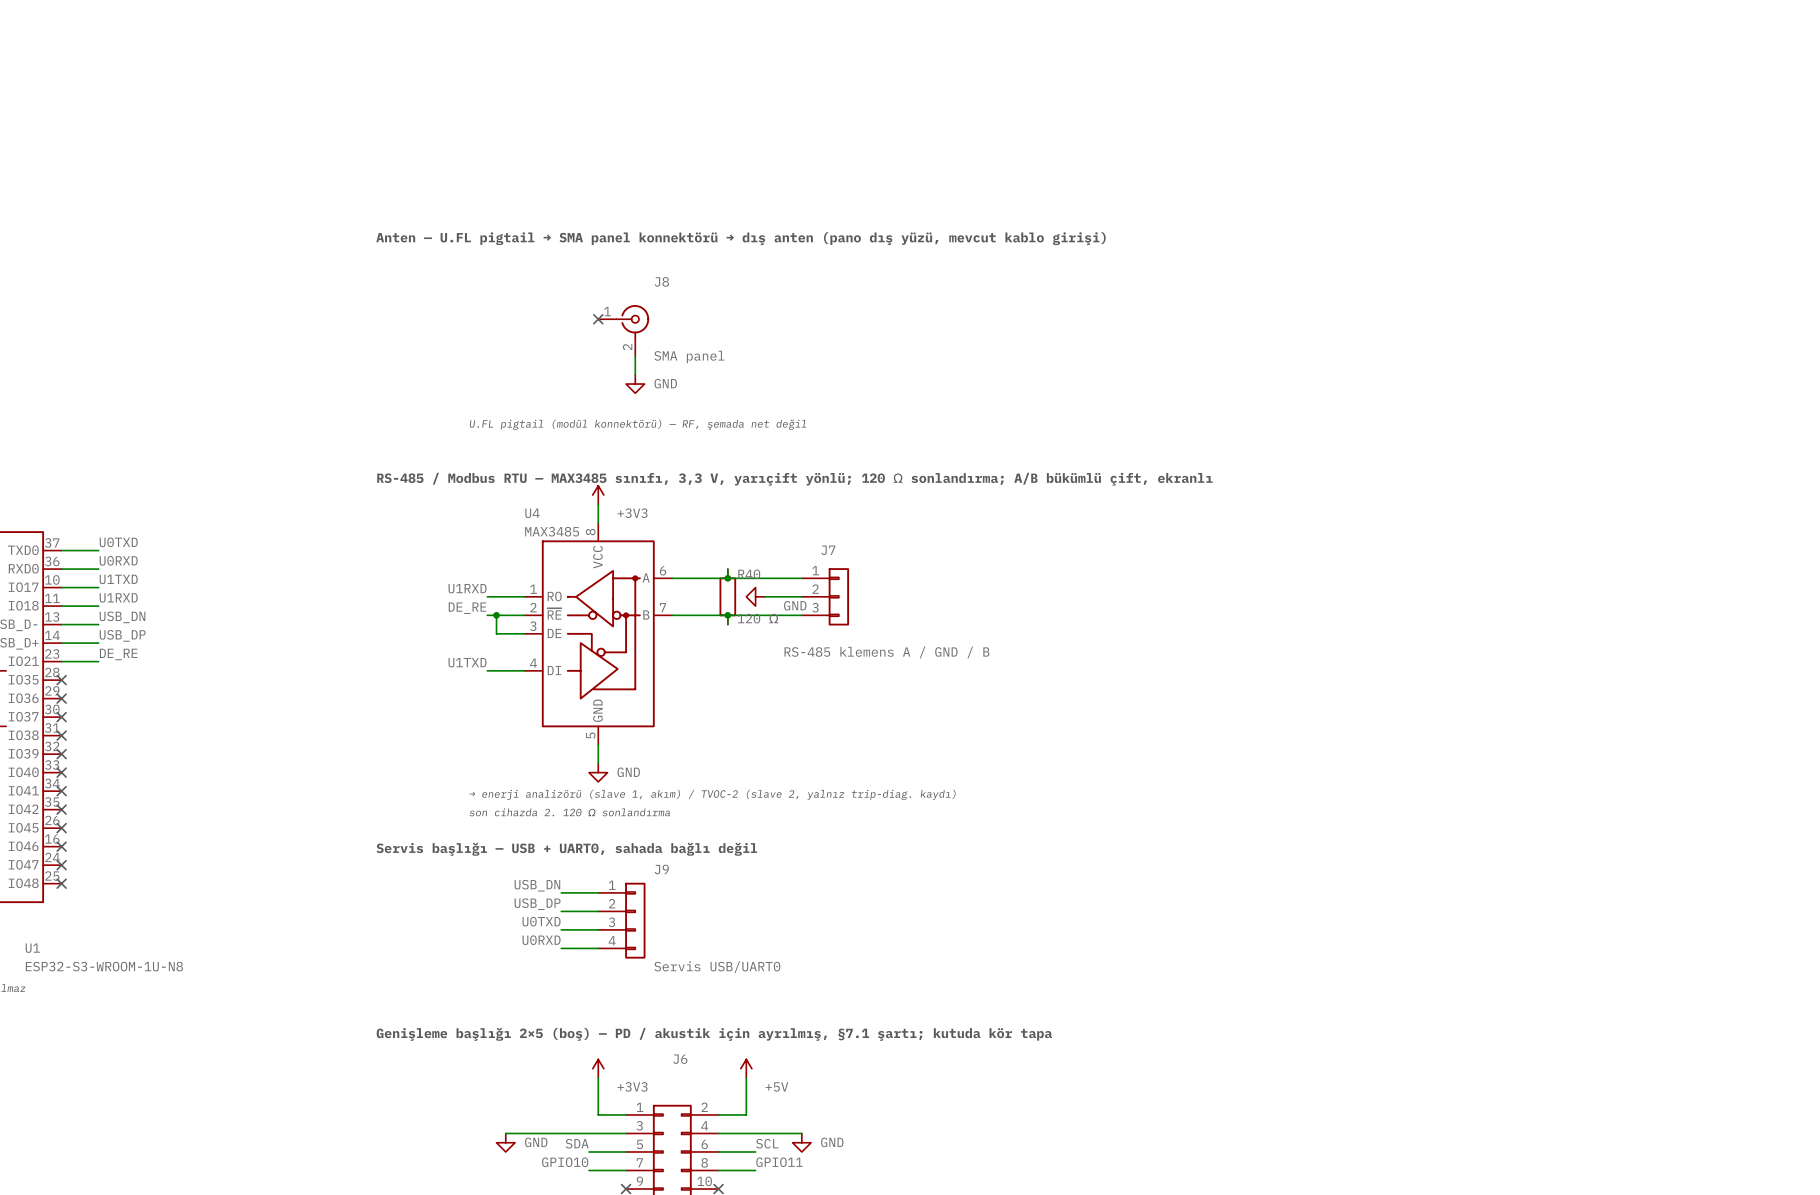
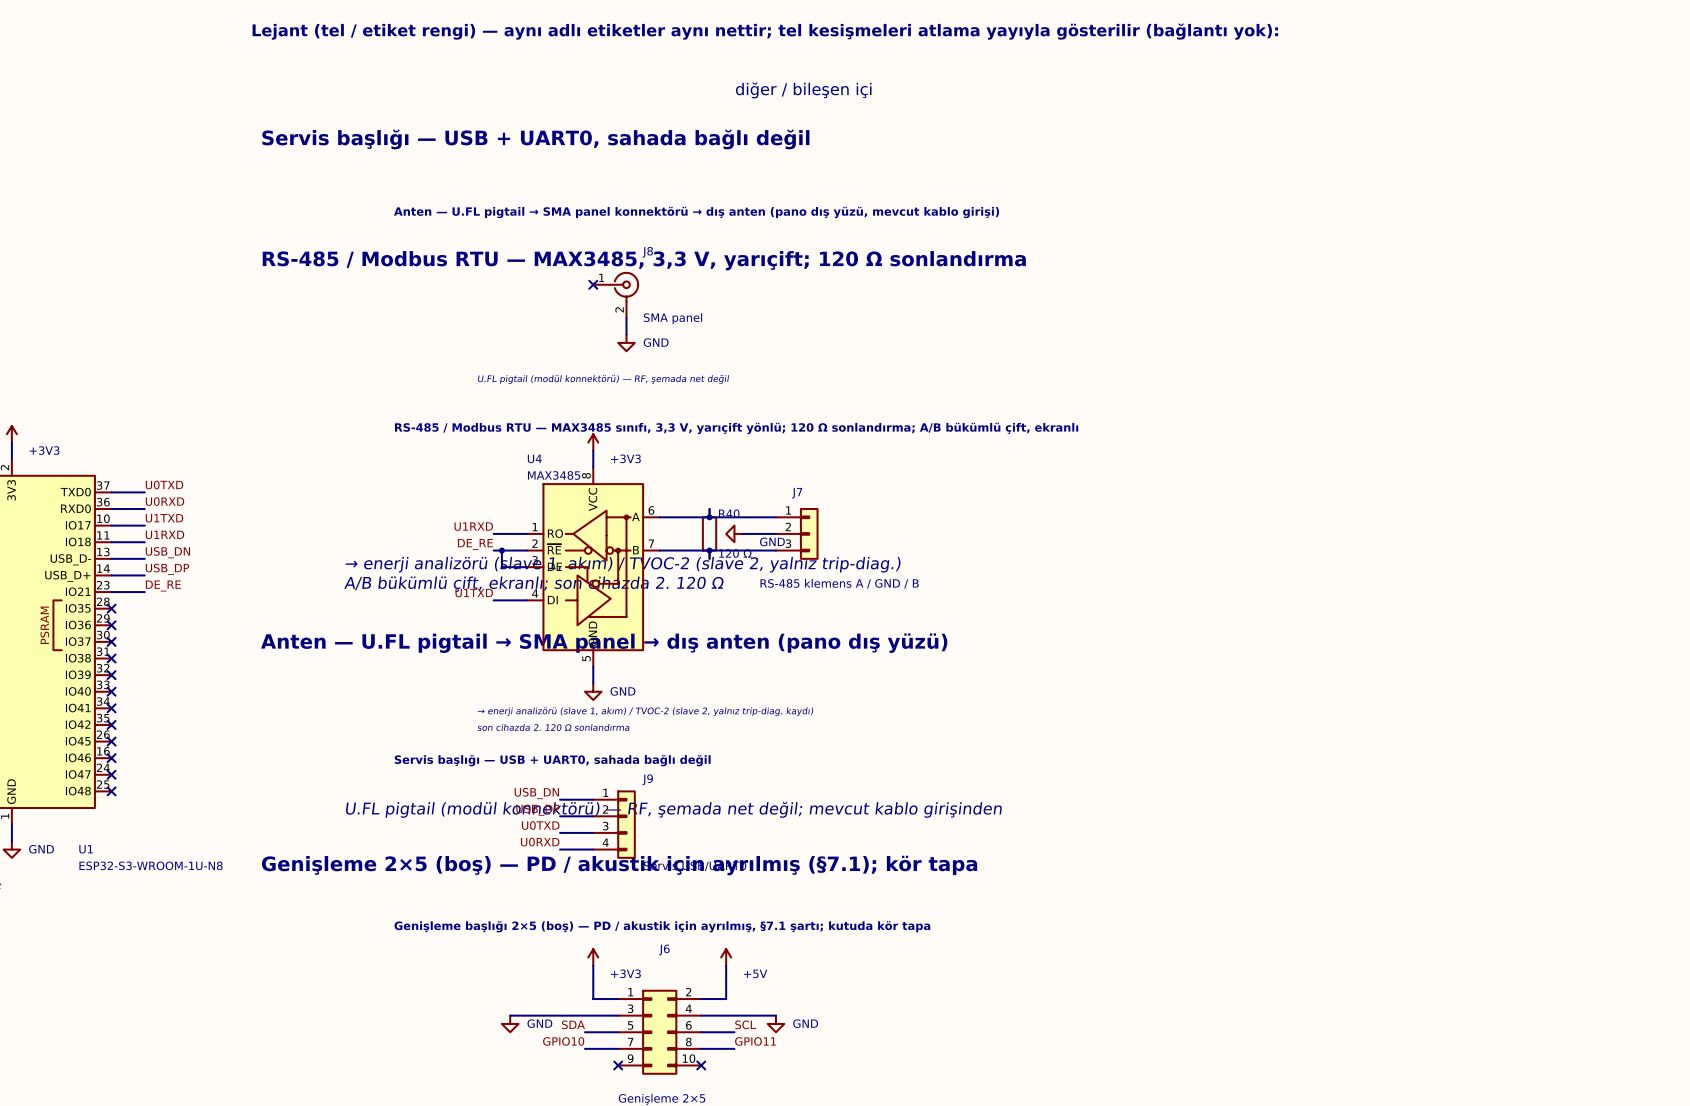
text: none -> Lejant (tel / etiket rengi) — aynı adlı etiketler aynı nettir; tel kesişmeleri atlama yayıyla gösterilir (bağlantı yok): (765, 31)
text: none -> diğer / bileşen içi (803, 90)
text: none -> Servis başlığı — USB + UART0, sahada bağlı değil (535, 139)
text: none -> RS-485 / Modbus RTU — MAX3485, 3,3 V, yarıçift; 120 Ω sonlandırma (644, 260)
text: none -> → enerji analizörü (slave 1, akım) / TVOC-2 (slave 2, yalnız trip-diag.) (623, 564)
text: none -> A/B bükümlü çift, ekranlı; son cihazda 2. 120 Ω (534, 584)
text: none -> Anten — U.FL pigtail → SMA panel → dış anten (pano dış yüzü) (604, 643)
text: none -> U.FL pigtail (modül konnektörü) — RF, şemada net değil; mevcut kablo girişinden (673, 809)
text: none -> Genişleme 2×5 (boş) — PD / akustik için ayrılmış (§7.1); kör tapa (619, 865)

